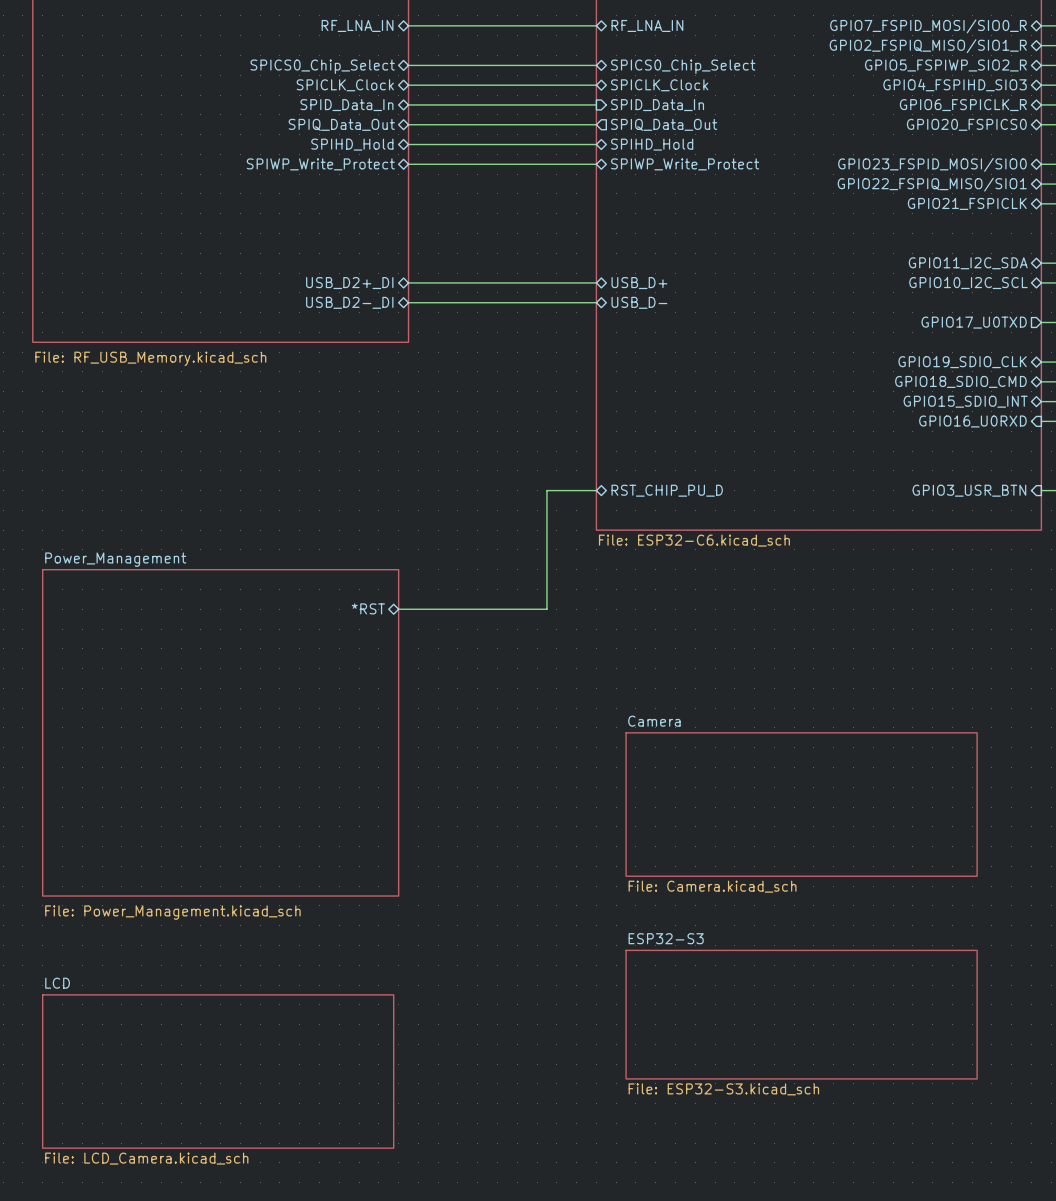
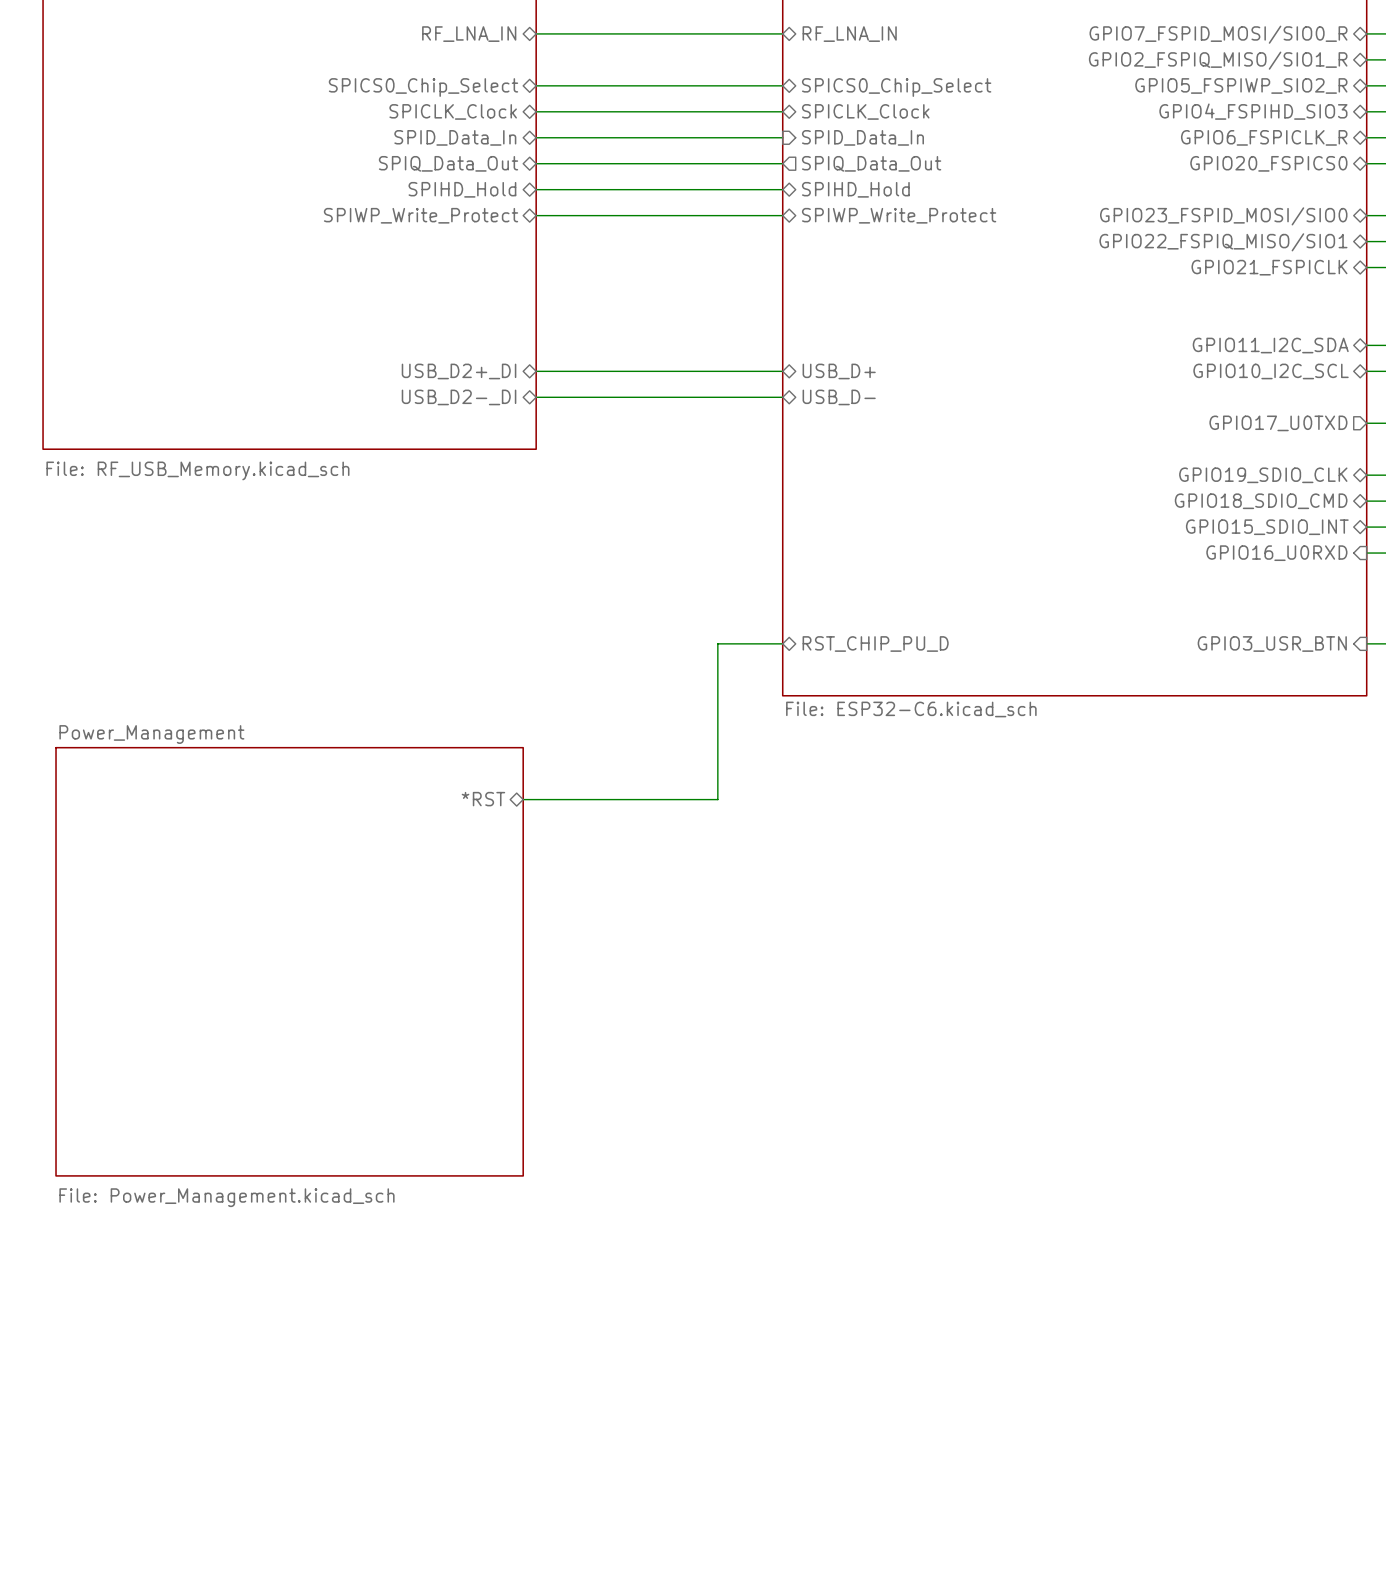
sheet Camera: File: Camera.kicad_sch (801, 804) -> none
sheet ESP32-S3: File: ESP32-S3.kicad_sch (801, 1014) -> none
sheet LCD: File: LCD_Camera.kicad_sch (218, 1071) -> none

